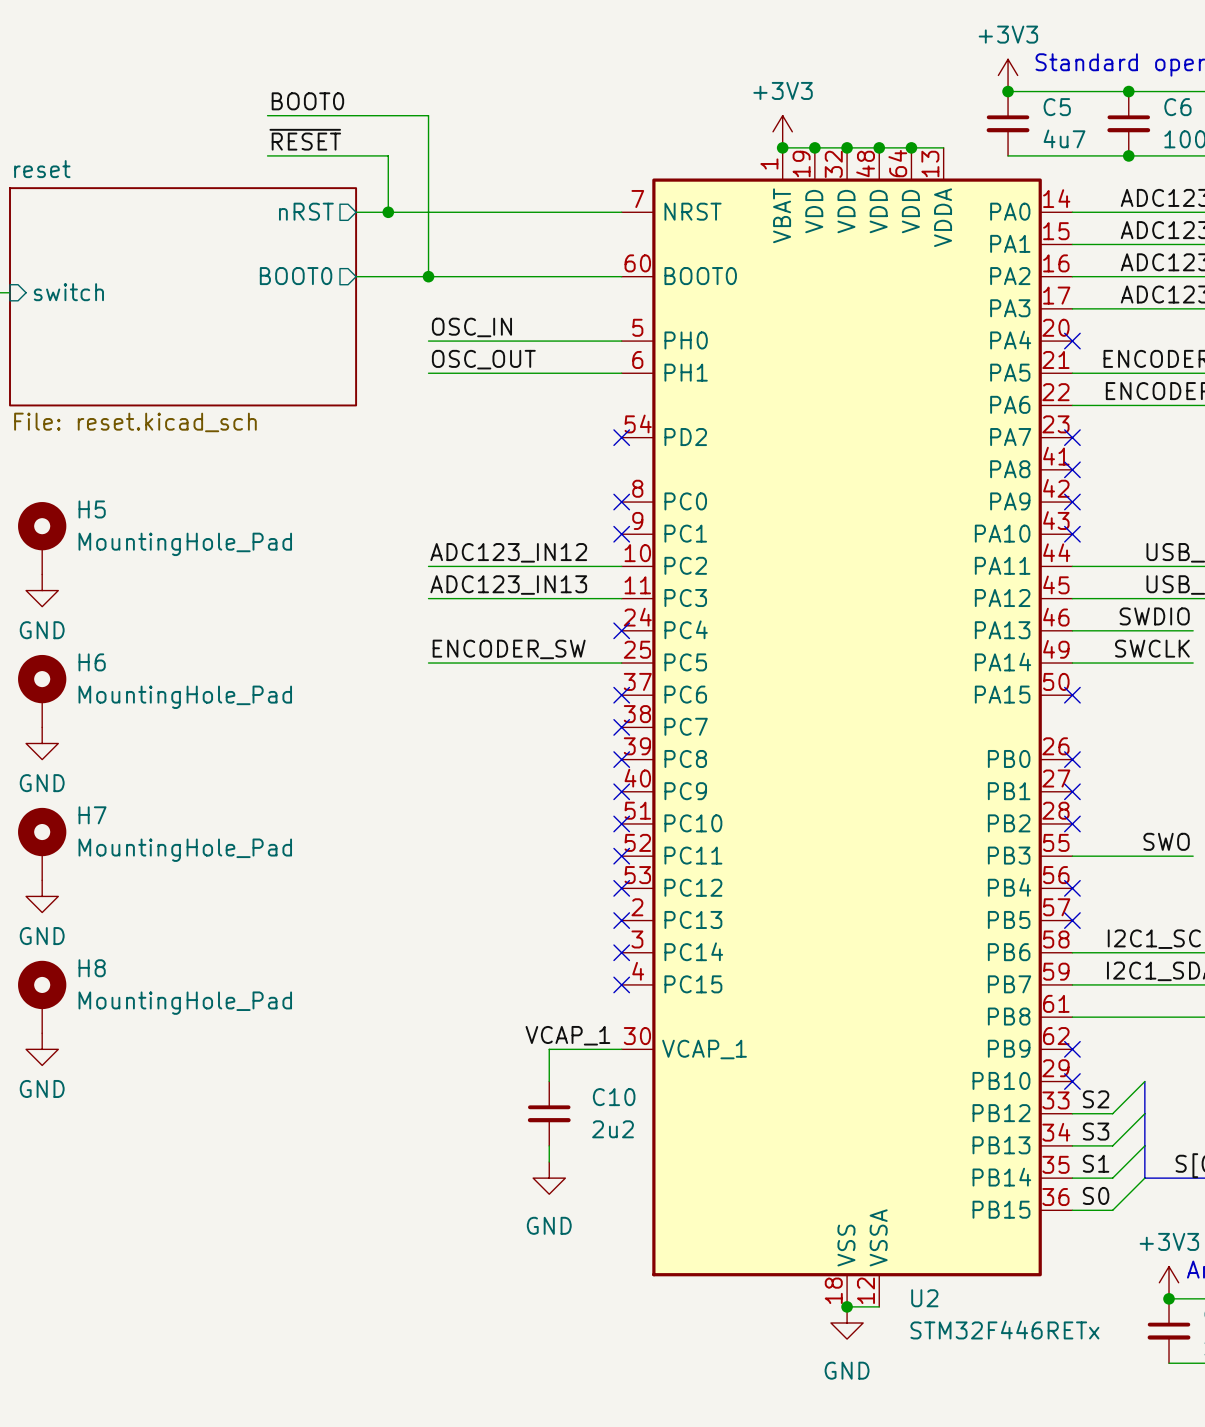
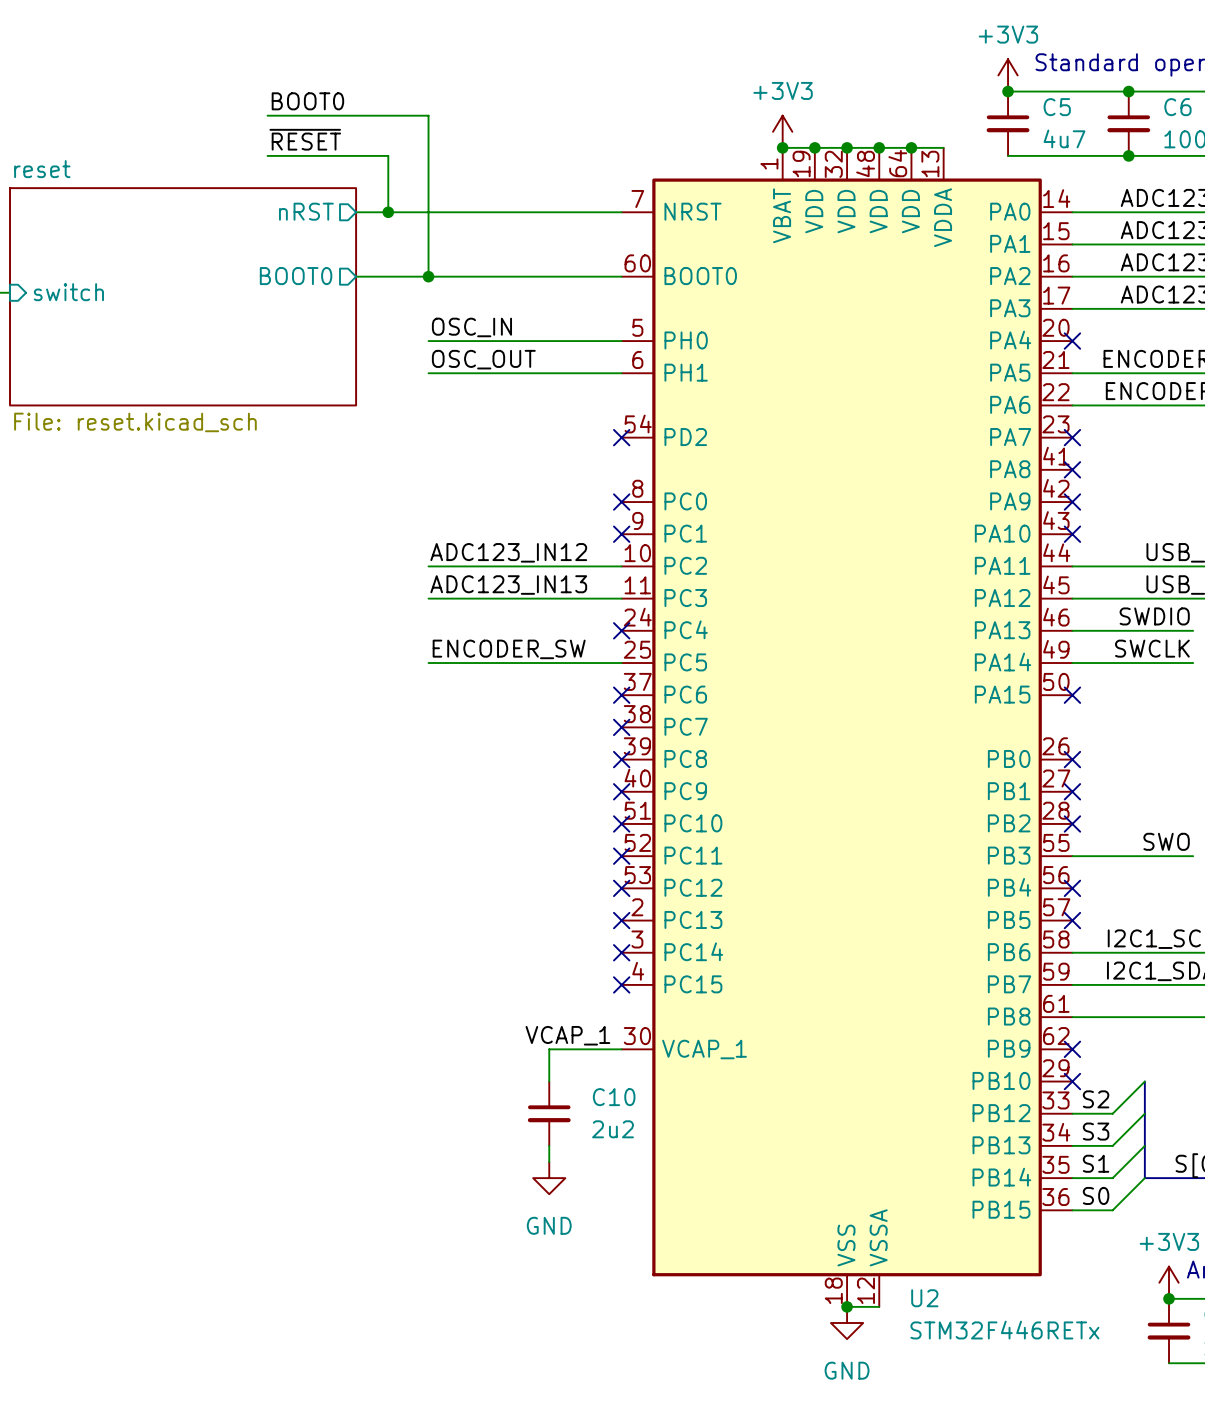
H5: MountingHole_Pad (42, 538) -> none
power symbol: GND (42, 590) -> none
H6: MountingHole_Pad (42, 691) -> none
power symbol: GND (42, 743) -> none
H7: MountingHole_Pad (42, 844) -> none
power symbol: GND (42, 896) -> none
H8: MountingHole_Pad (42, 997) -> none
power symbol: GND (42, 1049) -> none

